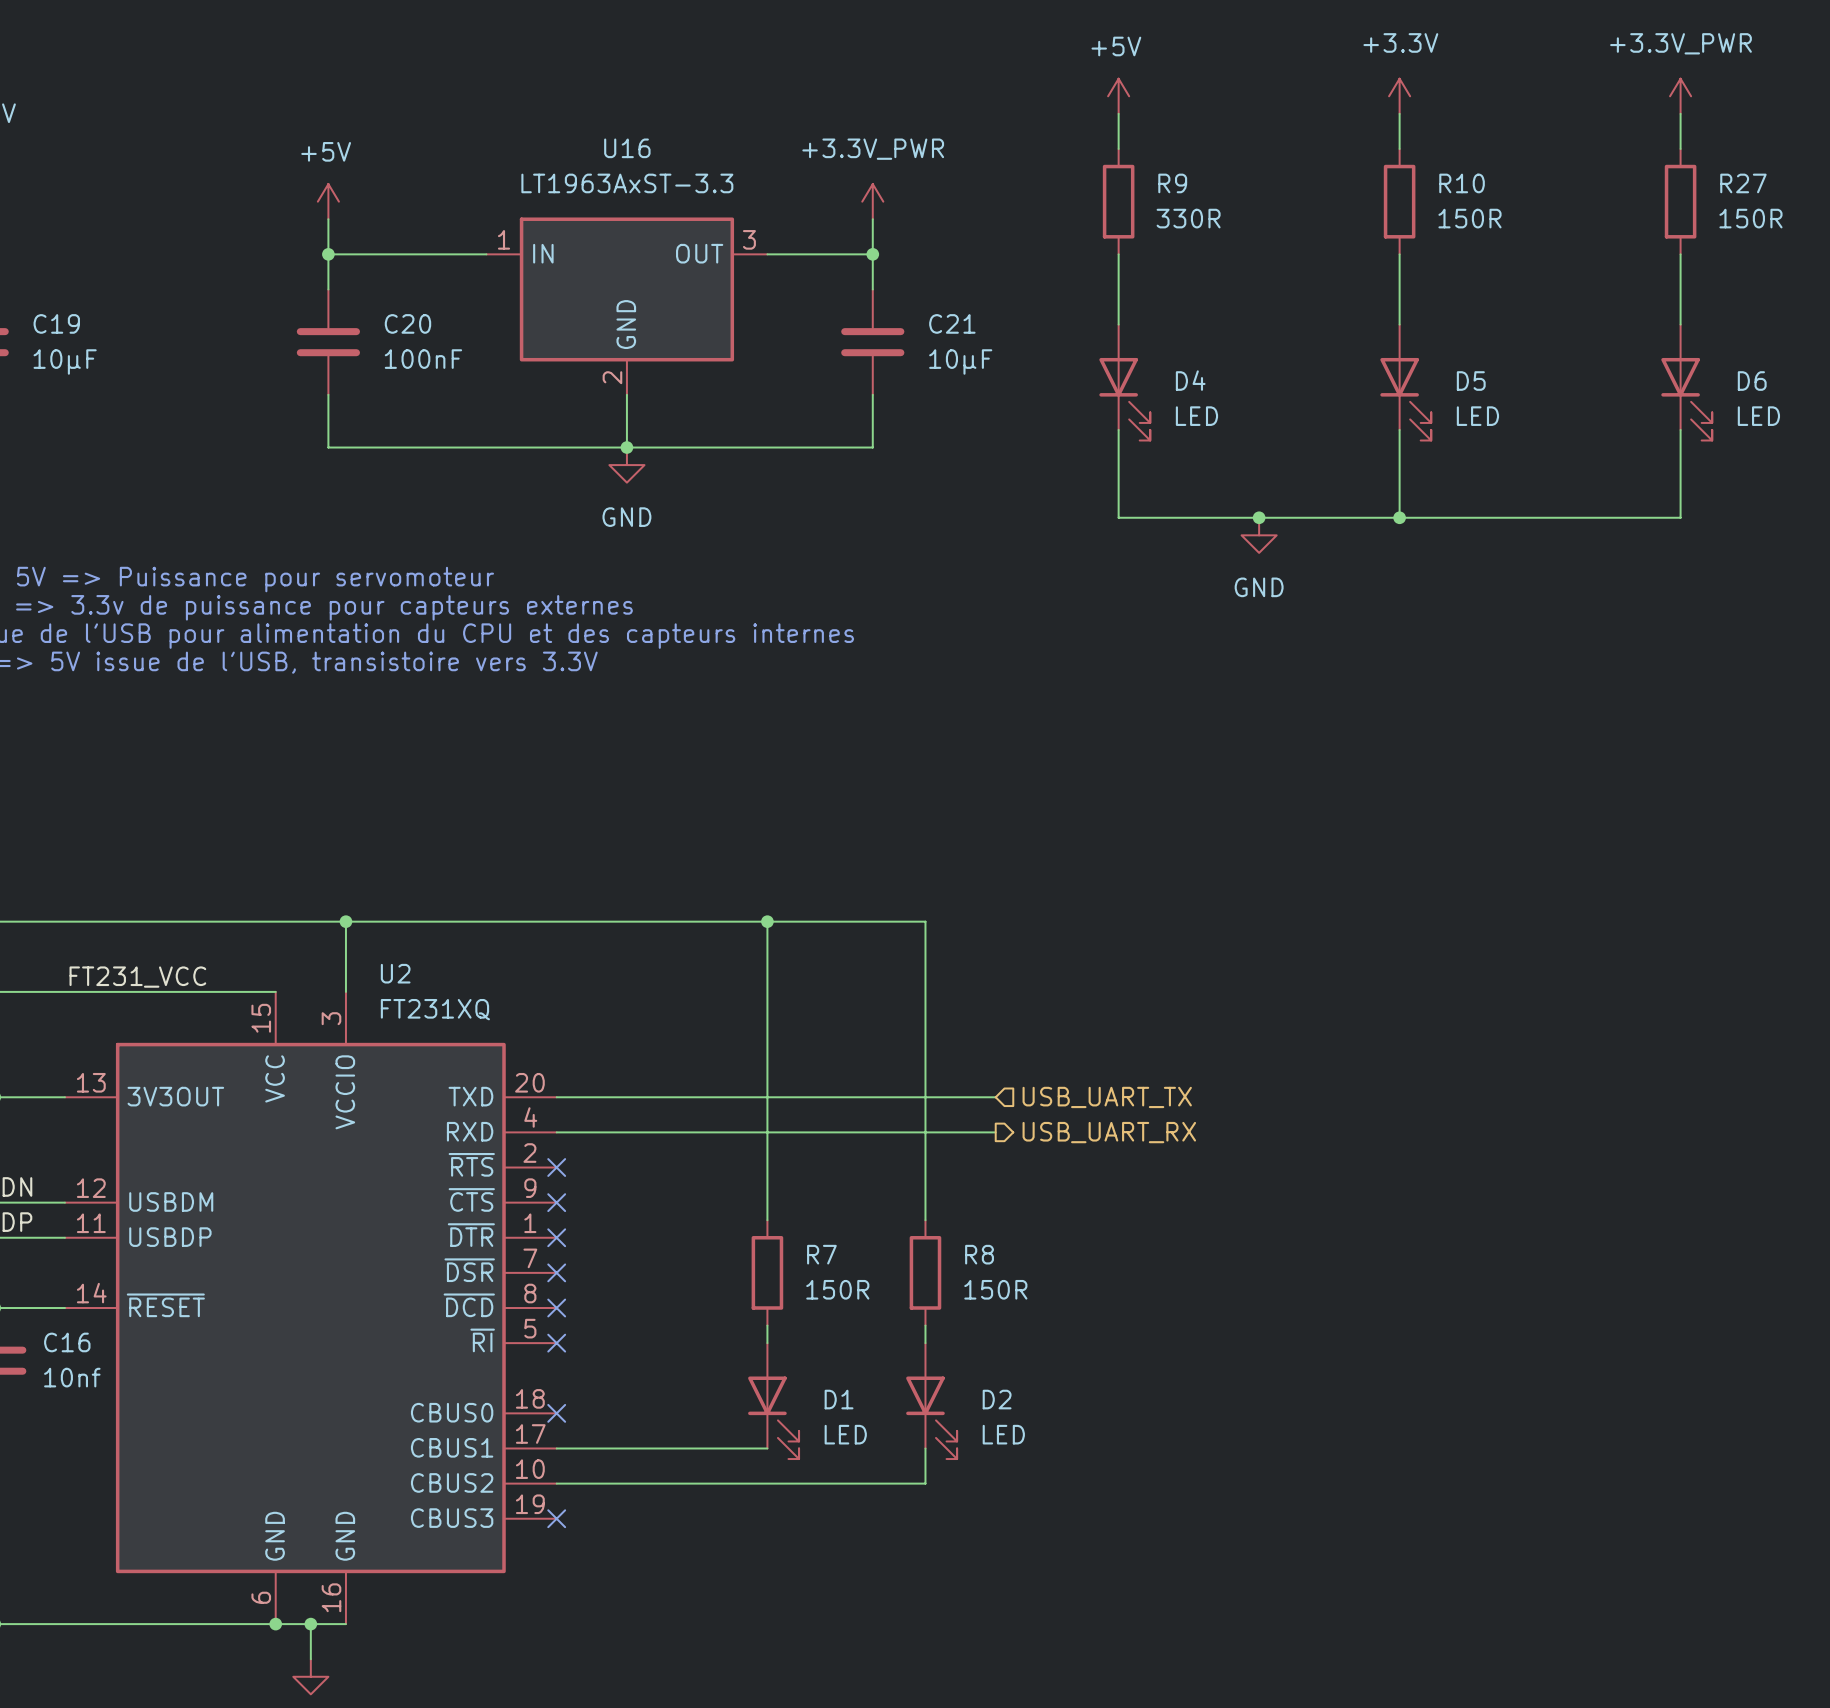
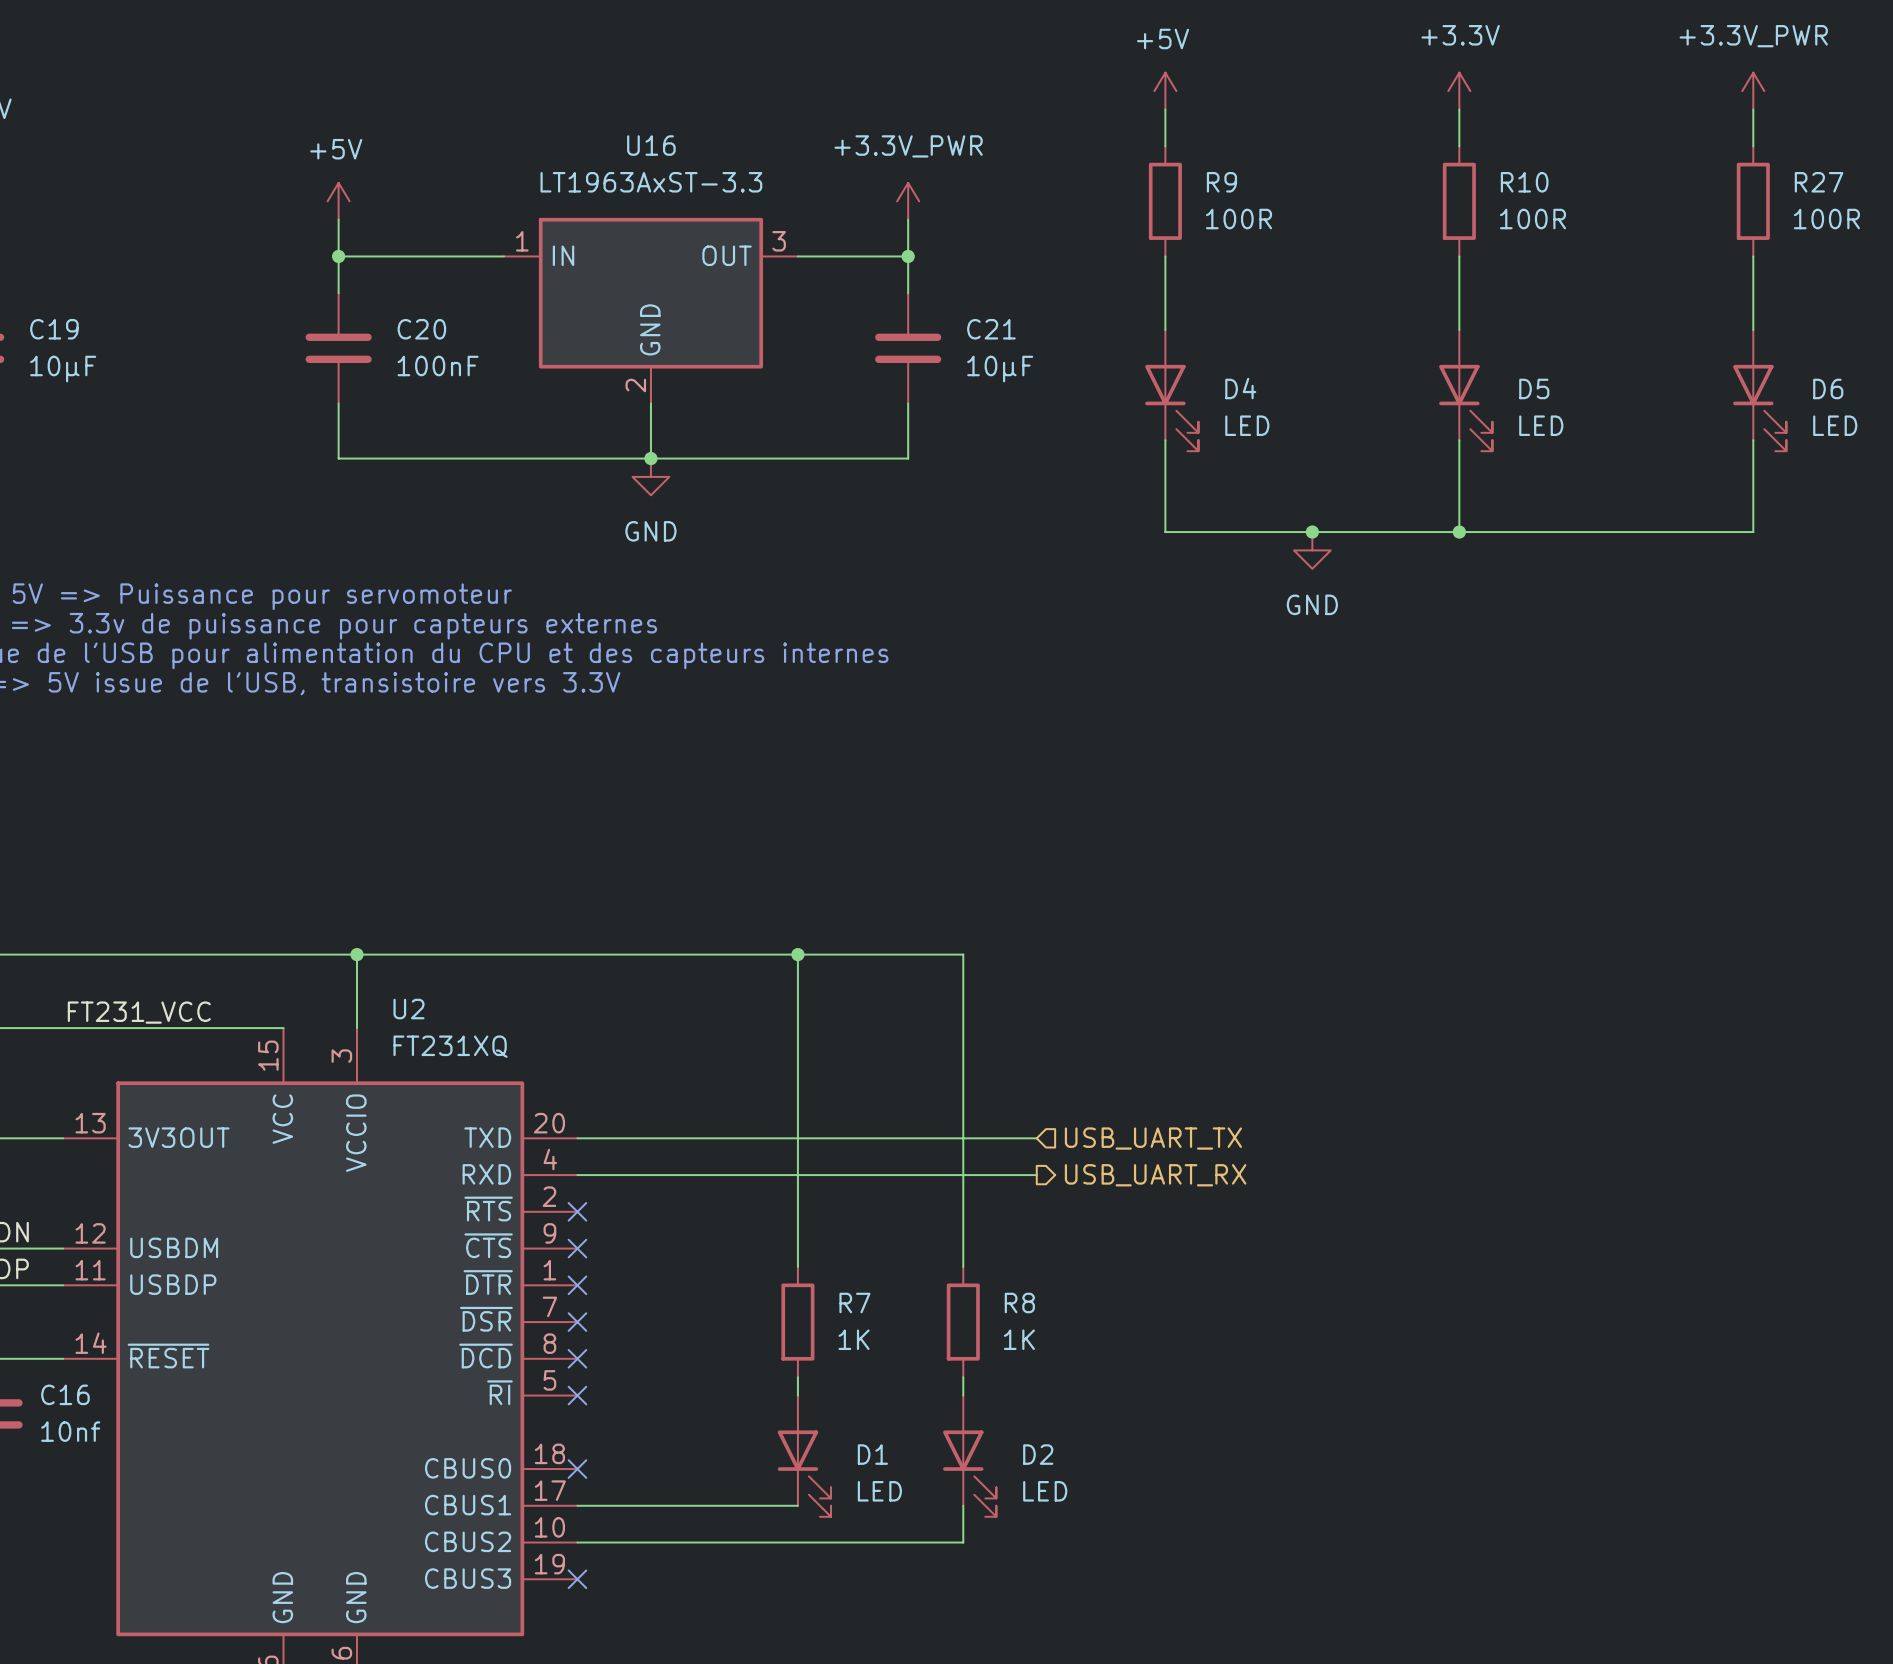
R9 value: 330R (1188, 218) -> 100R (1239, 219)
R10 value: 150R (1469, 218) -> 100R (1532, 219)
R27 value: 150R (1750, 218) -> 100R (1826, 219)
R7 value: 150R (837, 1289) -> 1K (854, 1339)
R8 value: 150R (995, 1289) -> 1K (1019, 1339)

